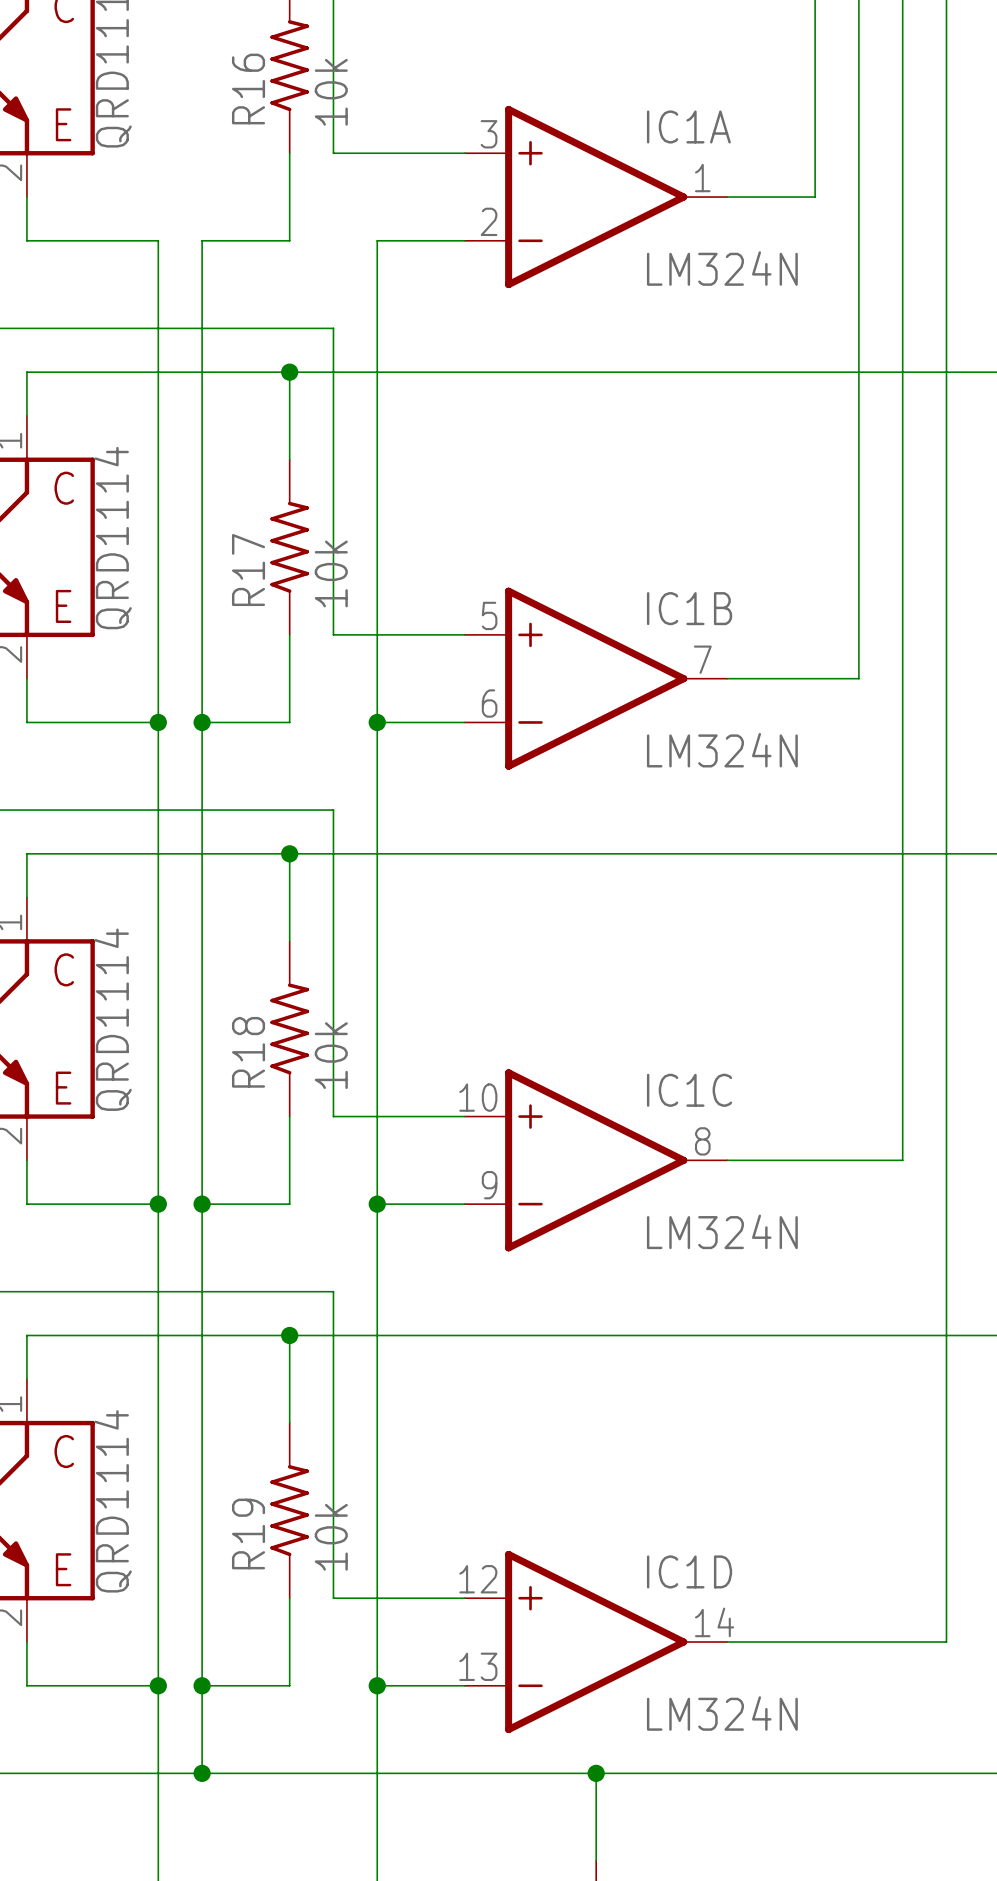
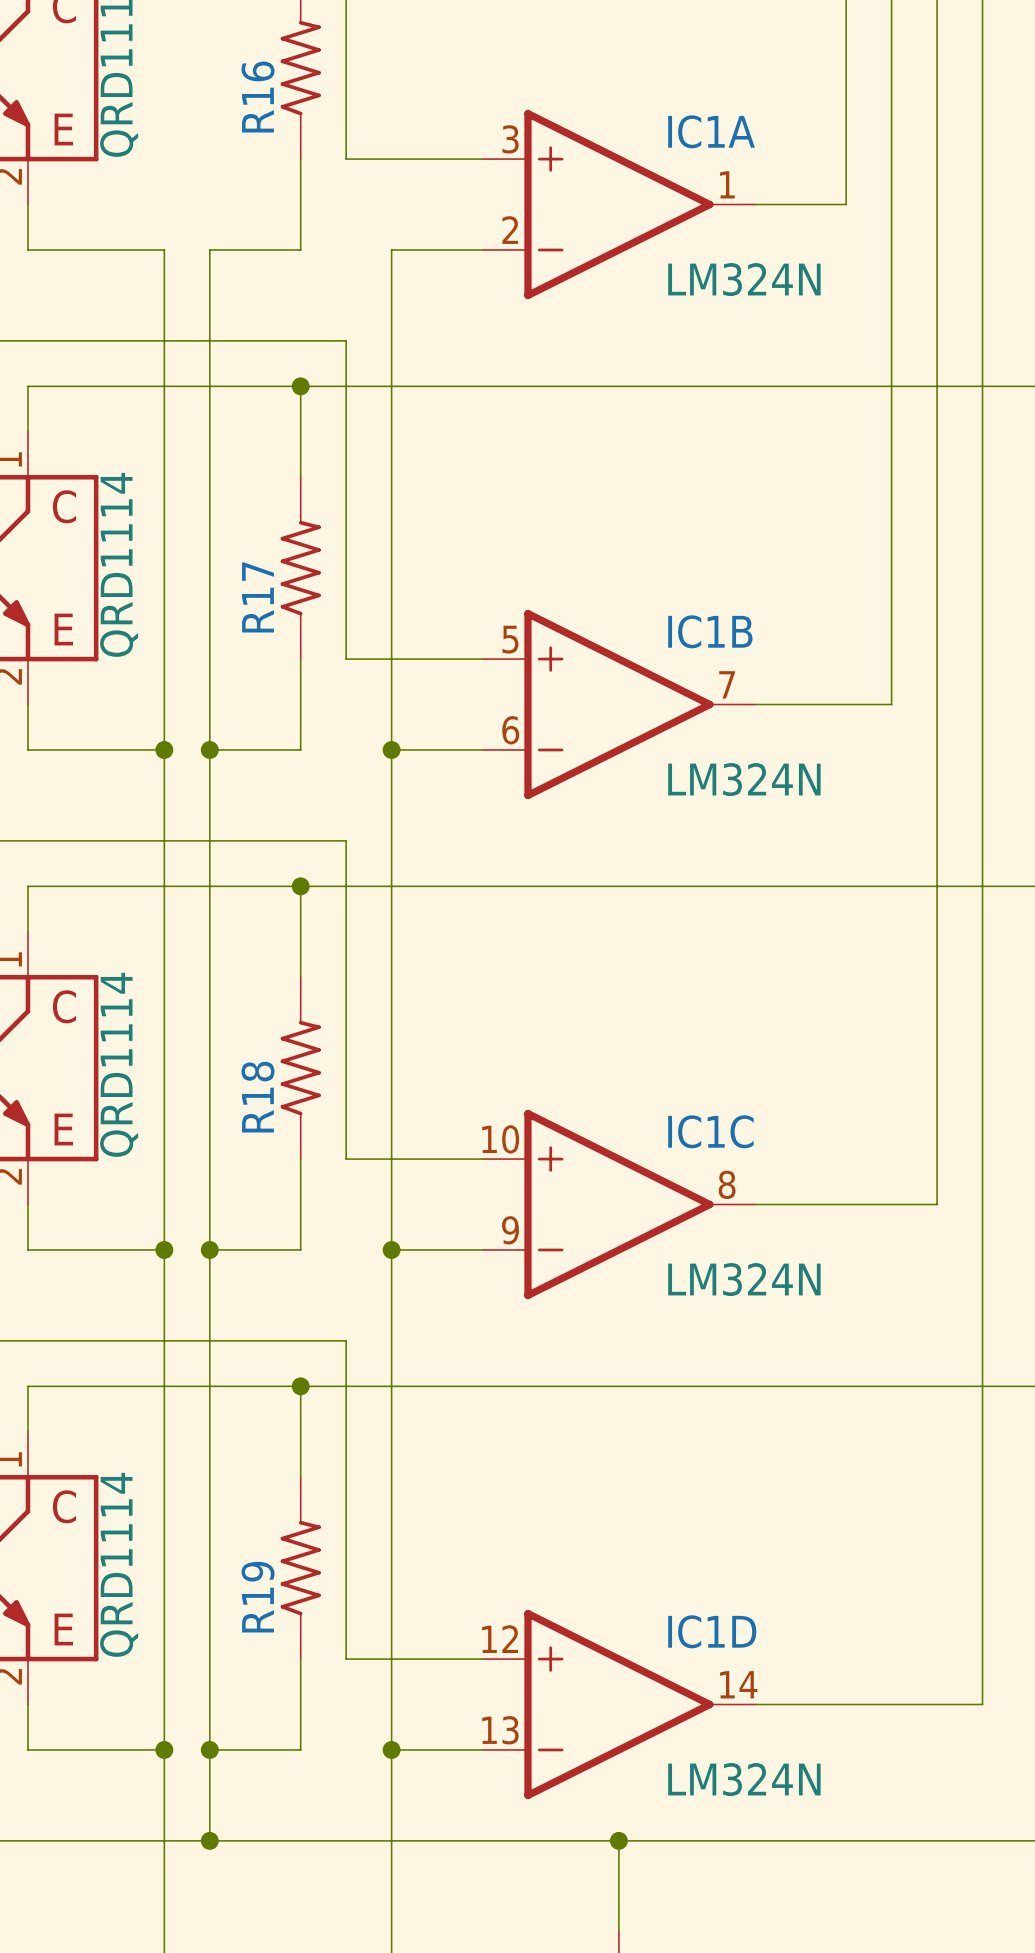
R16 value: 10k (331, 92) -> none
R17 value: 10k (331, 573) -> none
R18 value: 10k (331, 1055) -> none
R19 value: 10k (331, 1537) -> none

